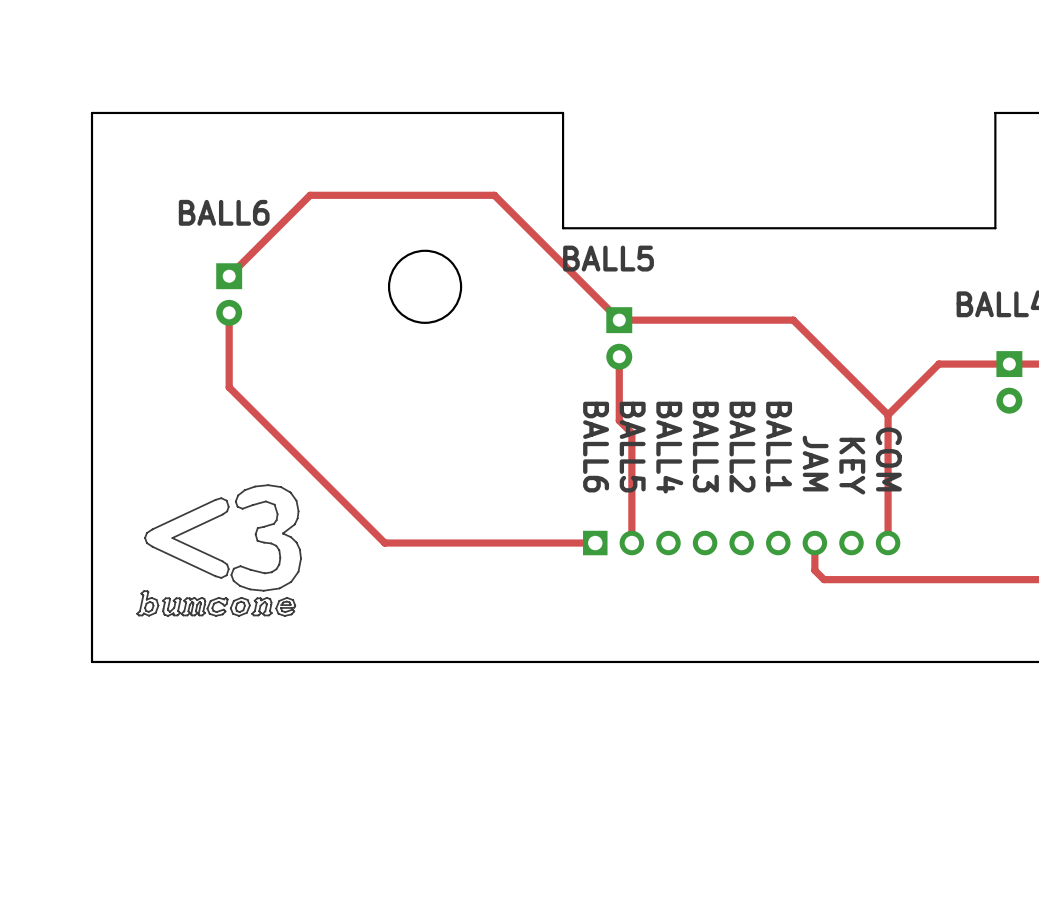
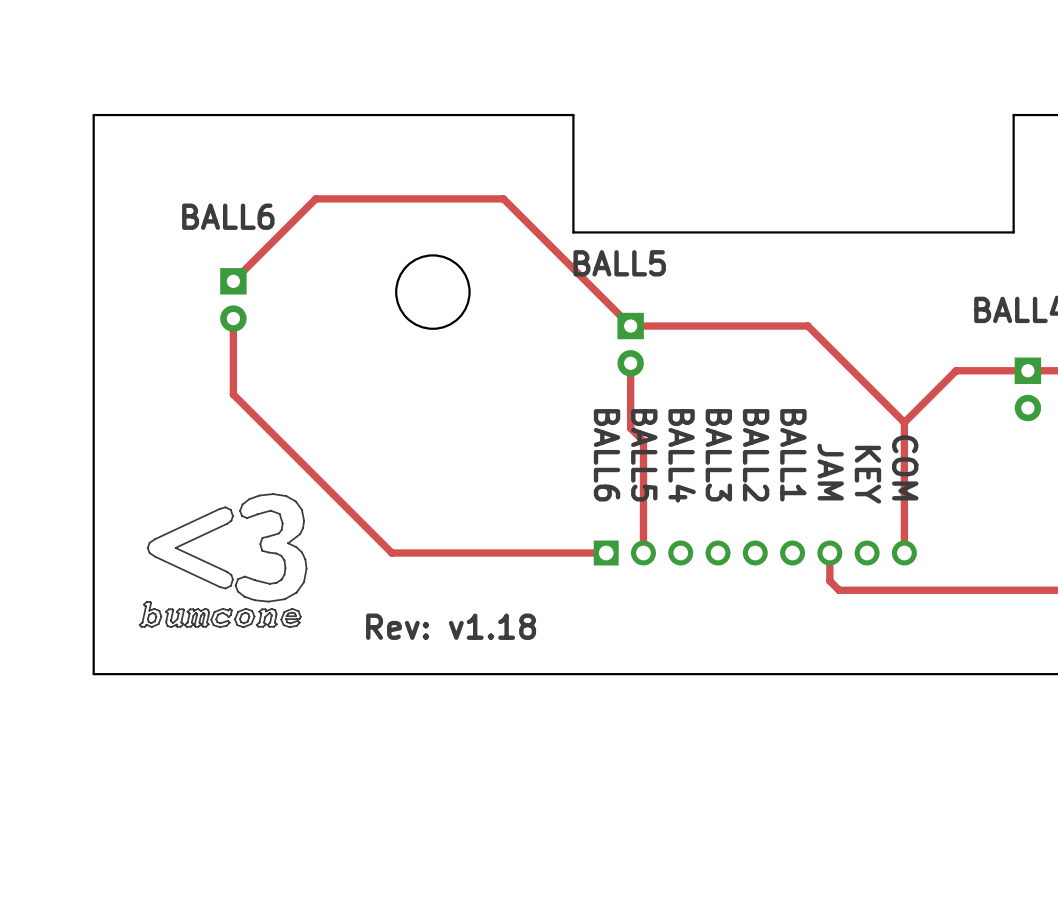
text: none -> Rev: v1.18 (451, 626)

